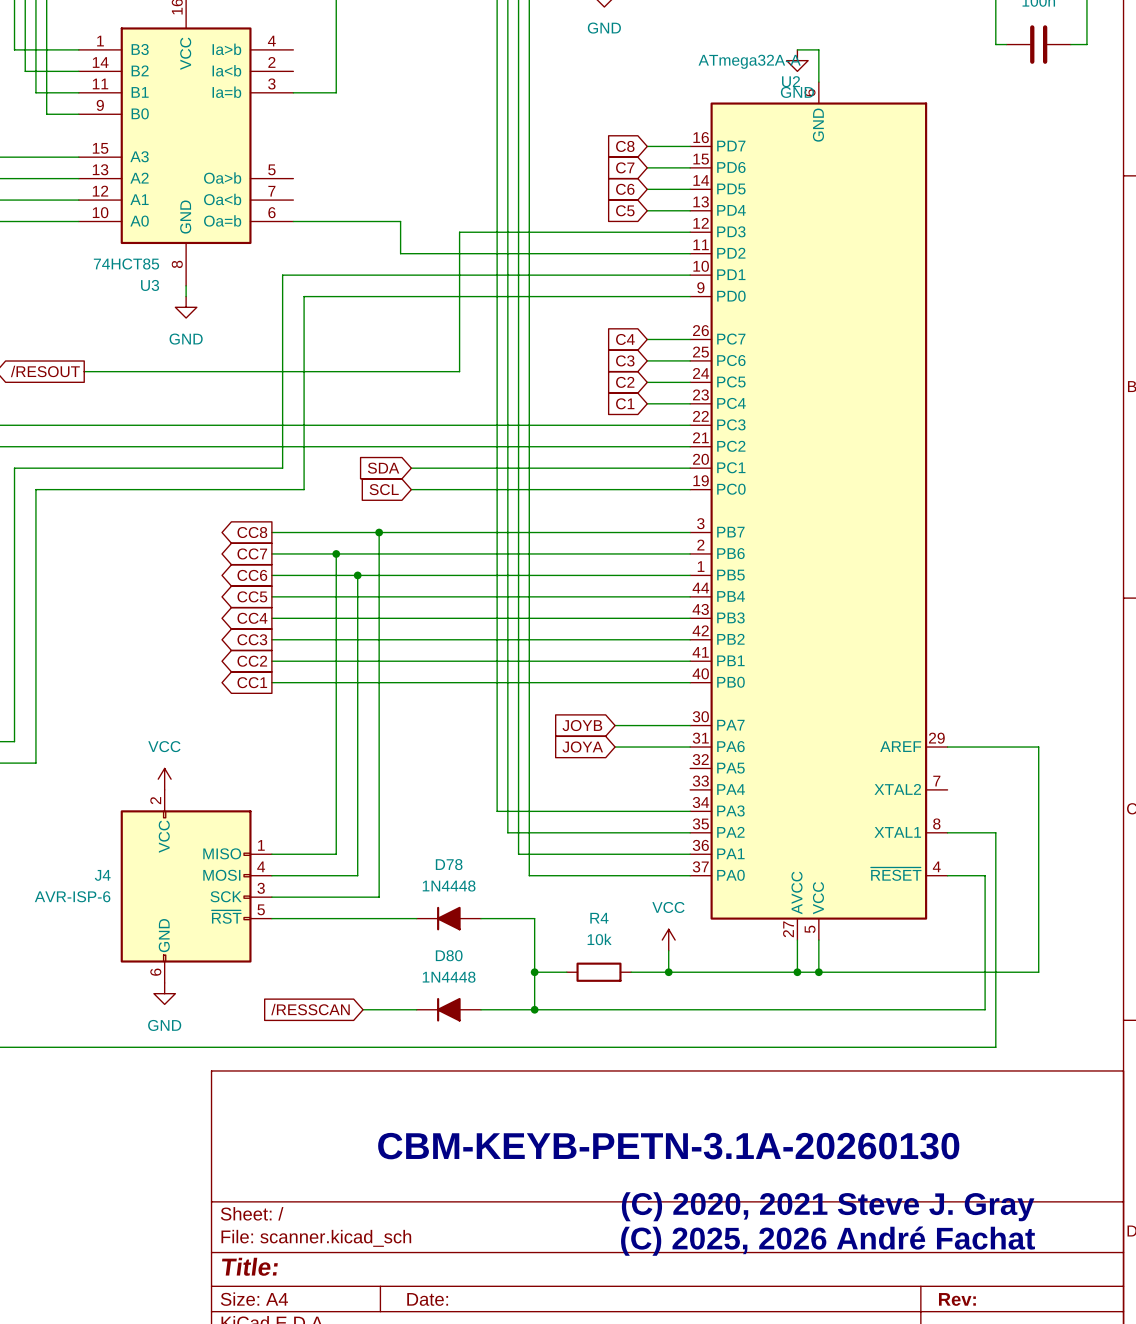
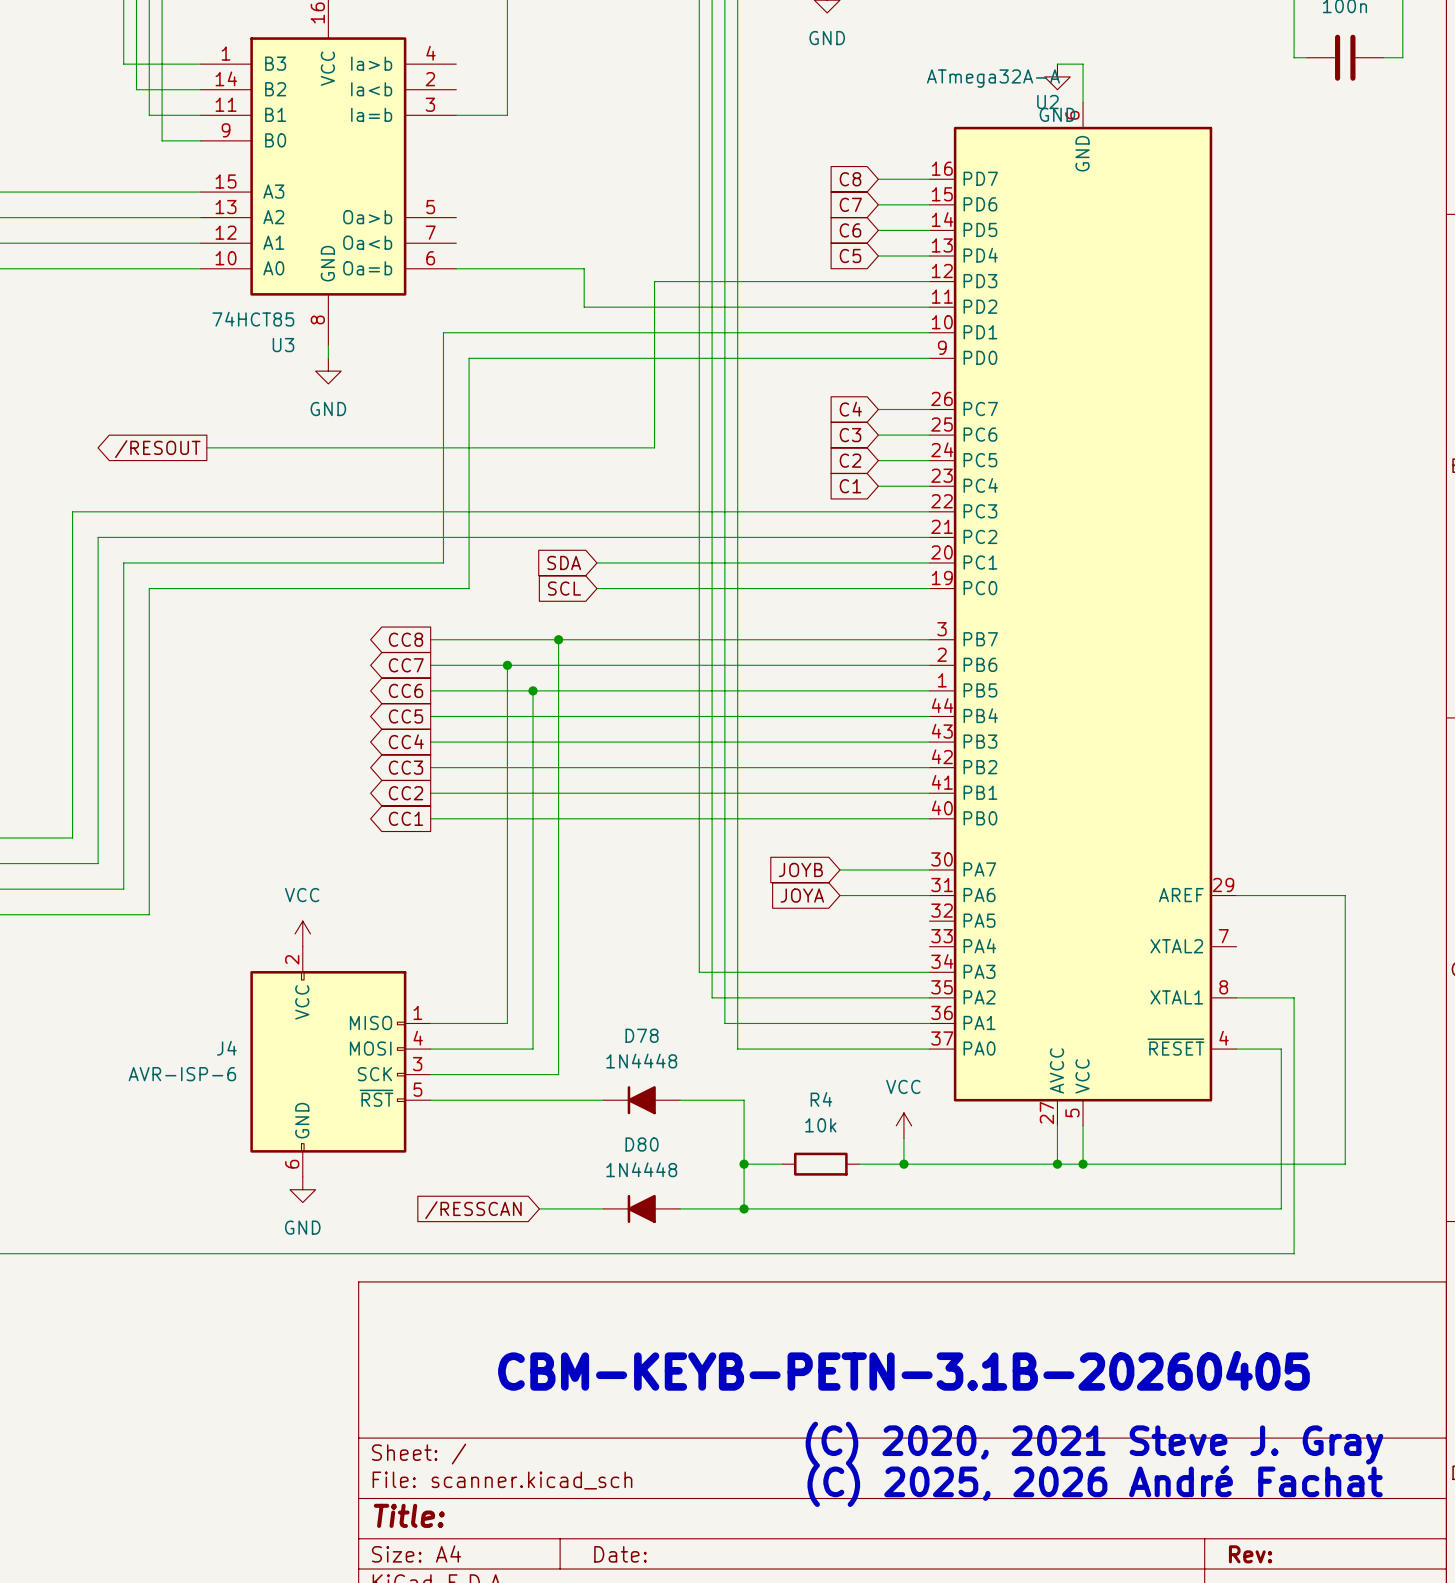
text: CBM-KEYB-PETN-3.1A-20260130 (668, 1146) -> CBM-KEYB-PETN-3.1B-20260405 (903, 1370)

